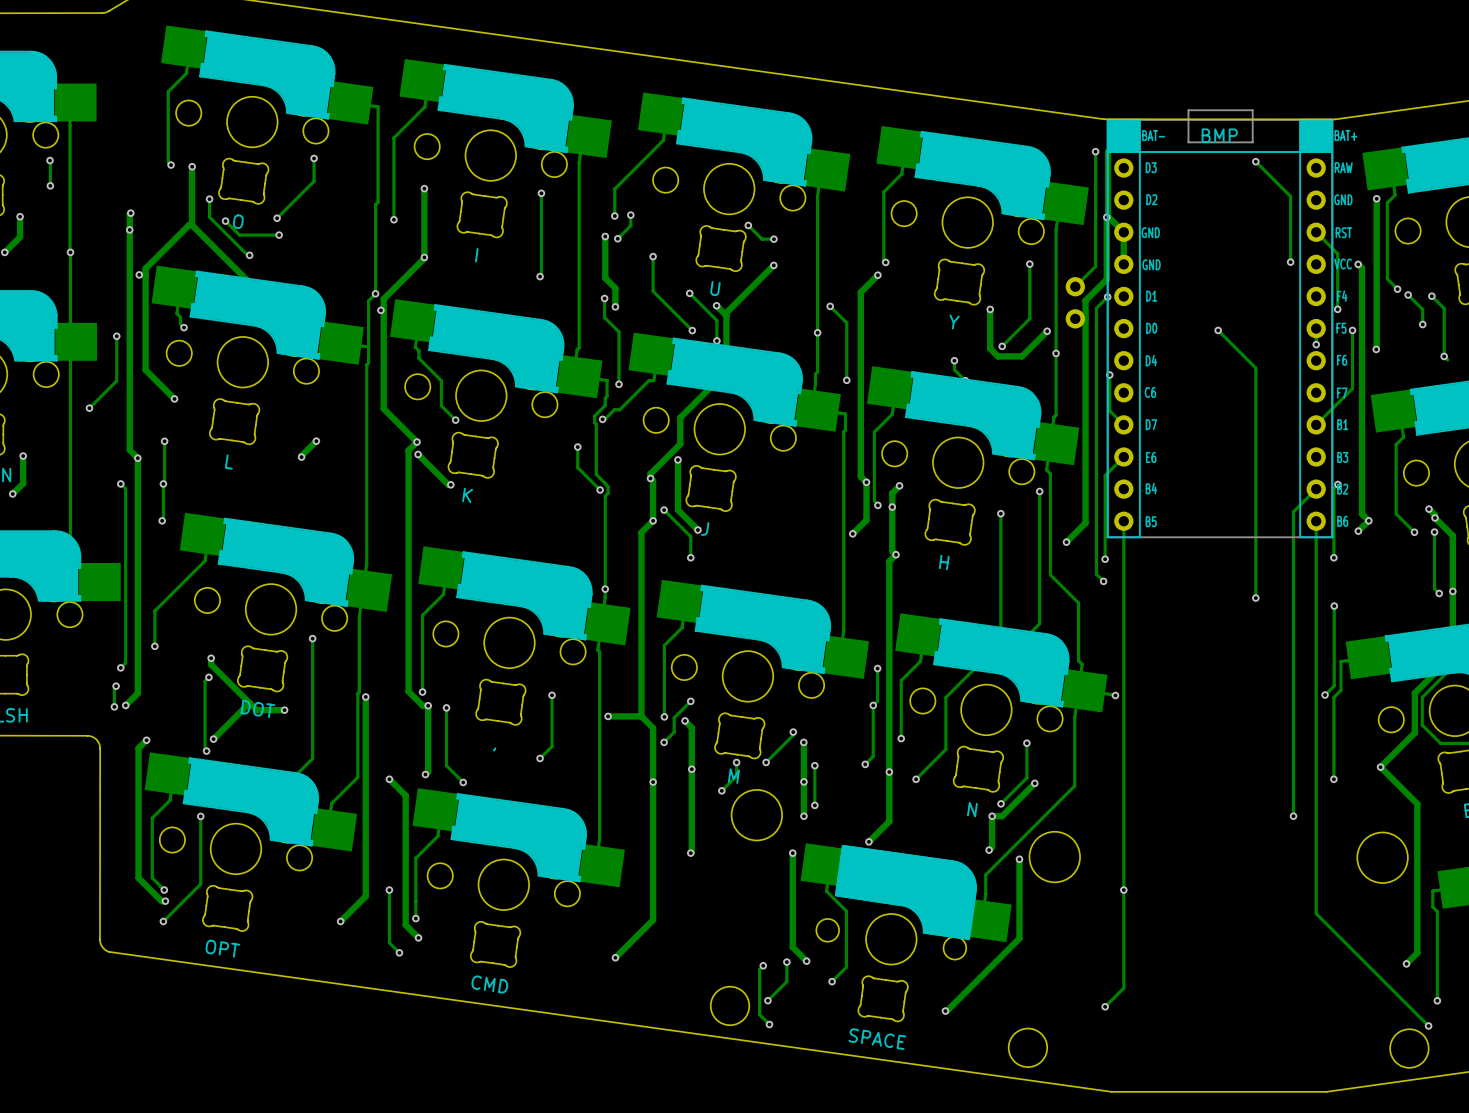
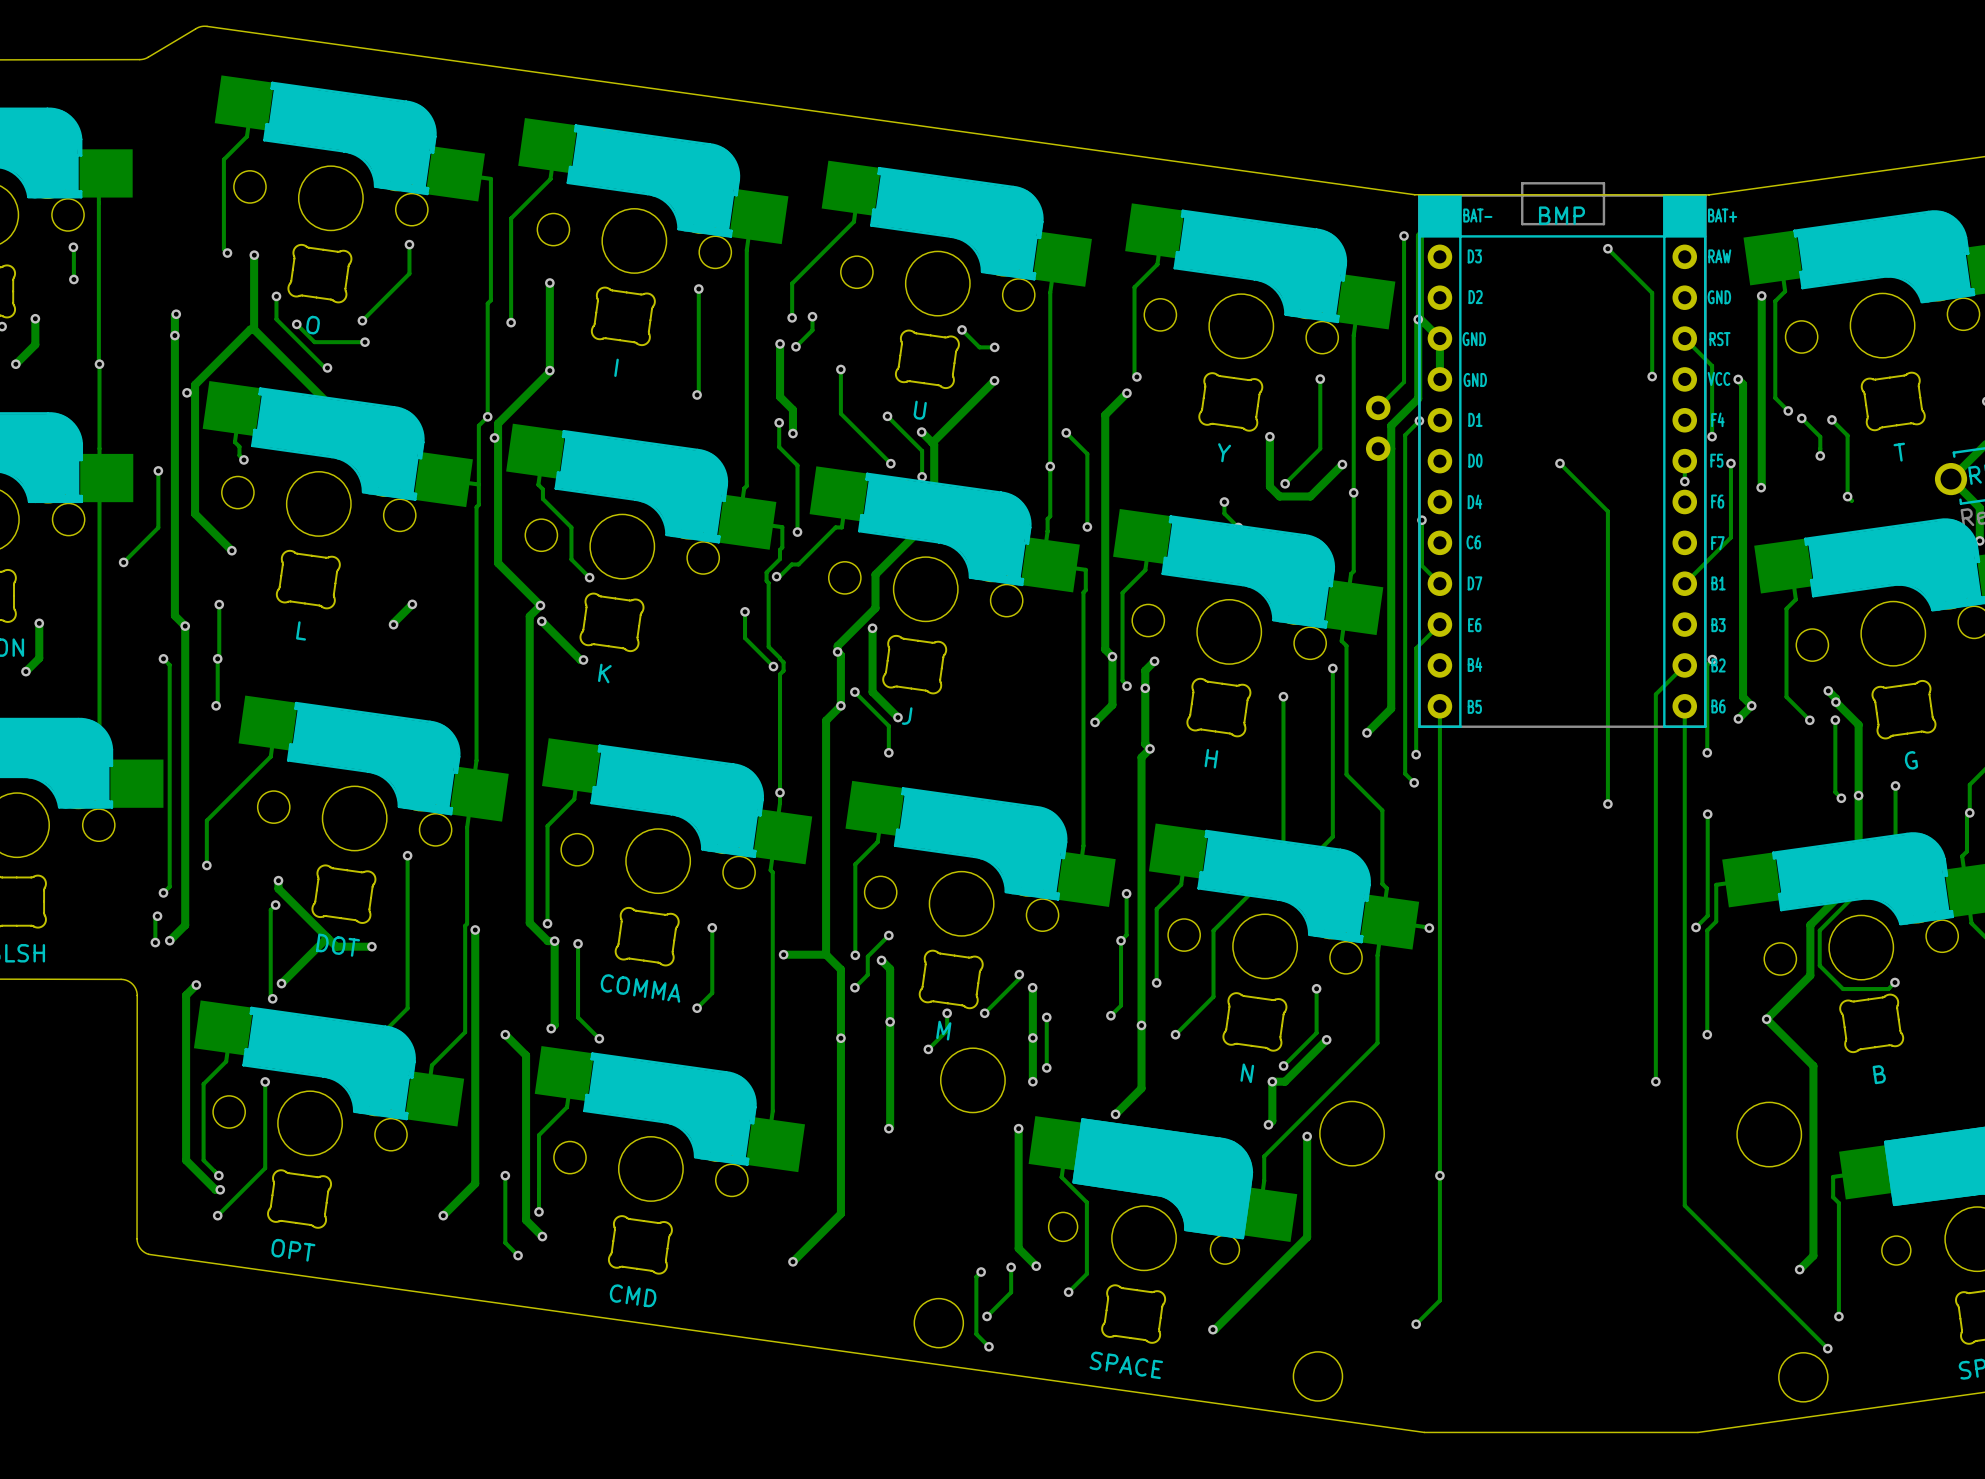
COMMA name: , (494, 749) -> COMMA (640, 988)

